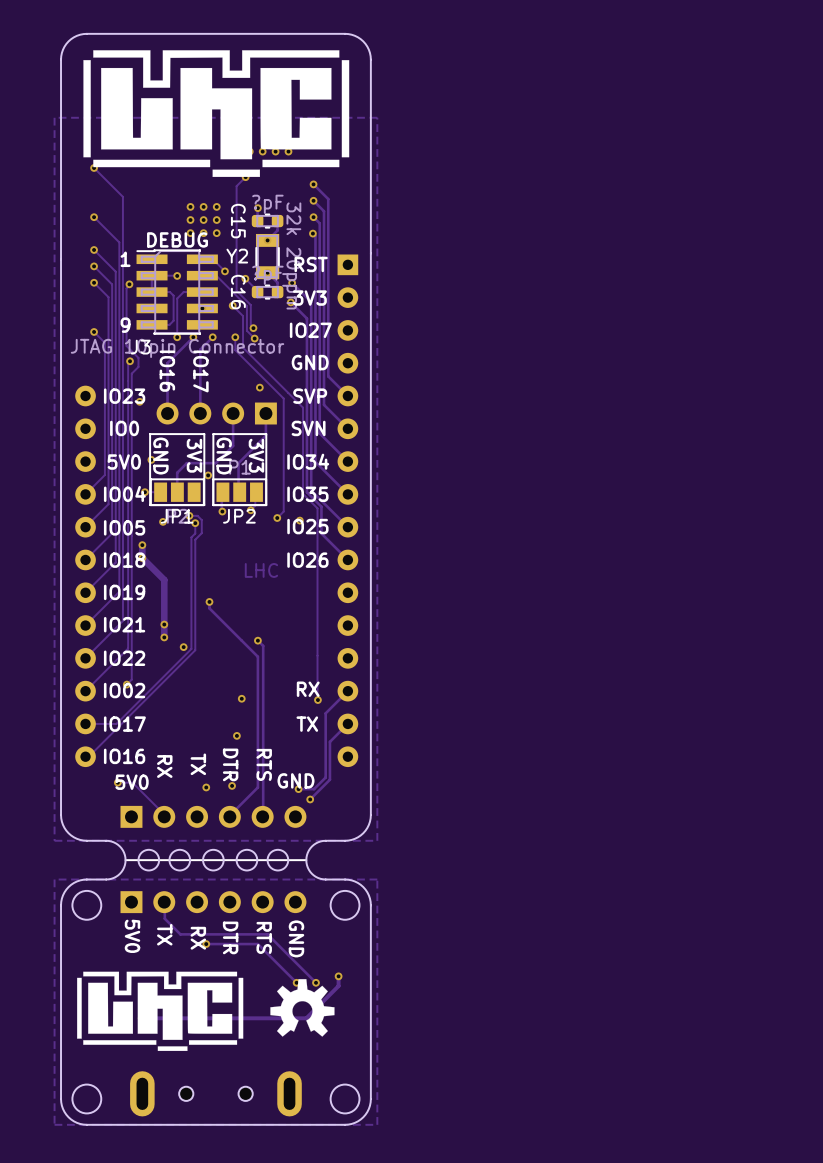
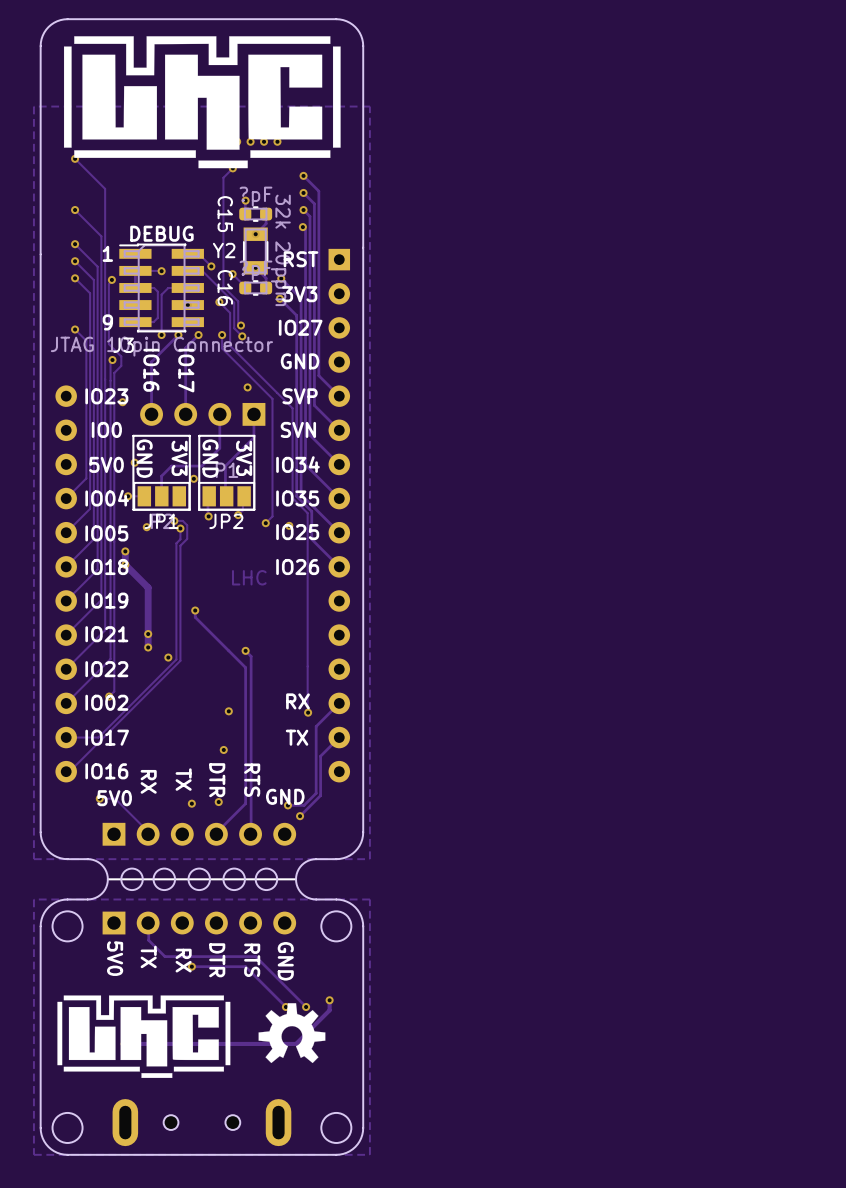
via: (190, 206) -> none
via: (203, 206) -> none
via: (216, 206) -> none
via: (190, 220) -> none
via: (203, 220) -> none
via: (216, 220) -> none
via: (190, 233) -> none
via: (203, 233) -> none
via: (216, 233) -> none

